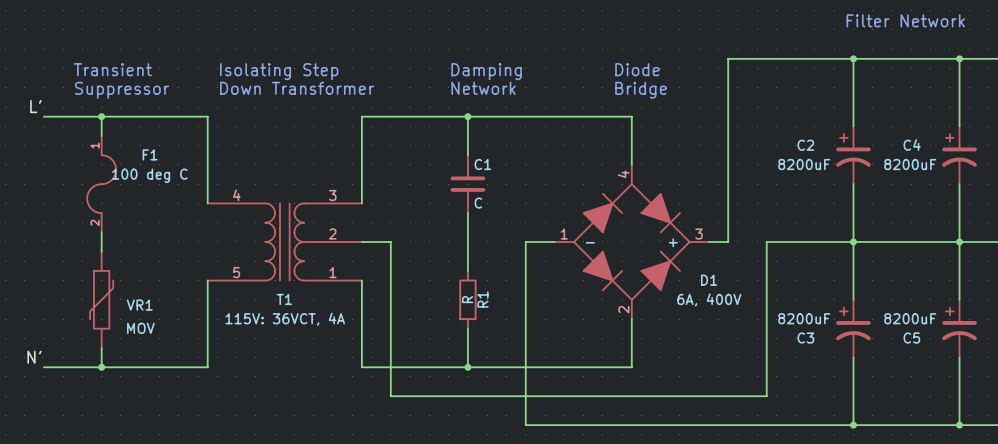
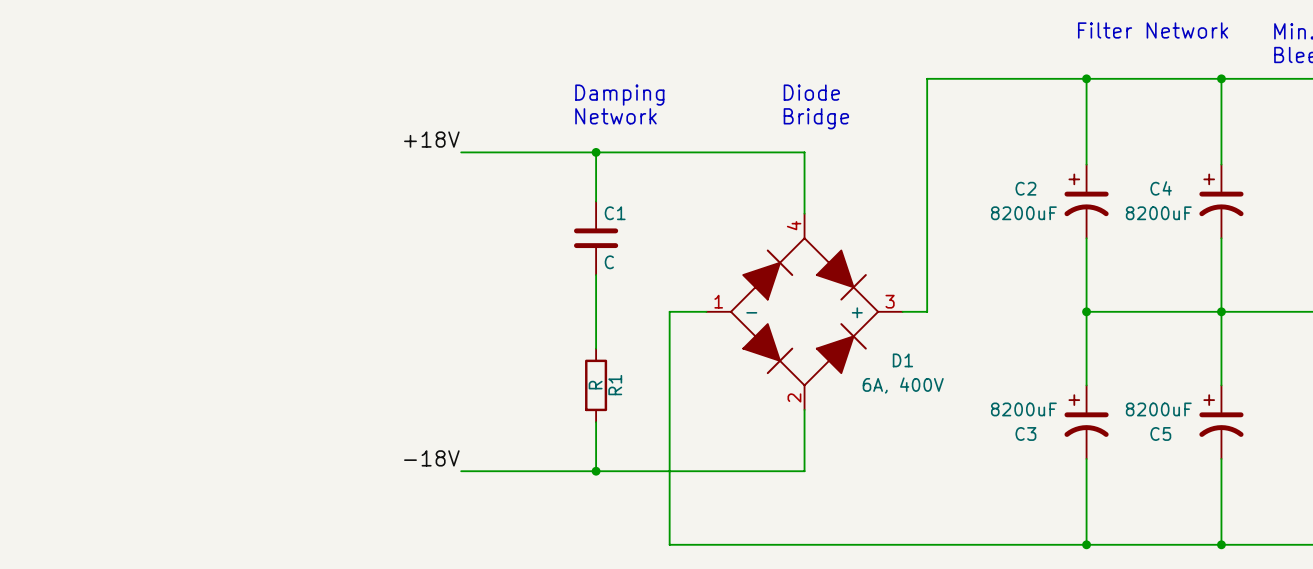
text: Transient (112, 69) -> none
text: Isolating Step (279, 71) -> none
text: Down Transformer (297, 88) -> none
text: Suppressor (121, 90) -> none
label: L' (35, 106) -> none
label: none -> +18V (431, 139)
wire: (43, 116) (207, 116) (207, 203) -> none
wire: (101, 116) (101, 135) -> none
junction: (101, 116) -> none
wire: (361, 116) (361, 203) -> none
F1: 100 deg C (101, 184) -> none
wire: (101, 232) (101, 251) -> none
T1: 115V: 36VCT, 4A (284, 241) -> none
wire: (361, 241) (390, 241) (390, 396) (766, 396) (766, 241) (853, 241) -> none
wire: (207, 280) (207, 367) (43, 367) -> none
wire: (361, 280) (361, 367) -> none
VR1: MOV (101, 299) -> none
wire: (101, 348) (101, 367) -> none
label: N' (34, 357) -> none
label: none -> -18V (431, 458)
junction: (101, 367) -> none

